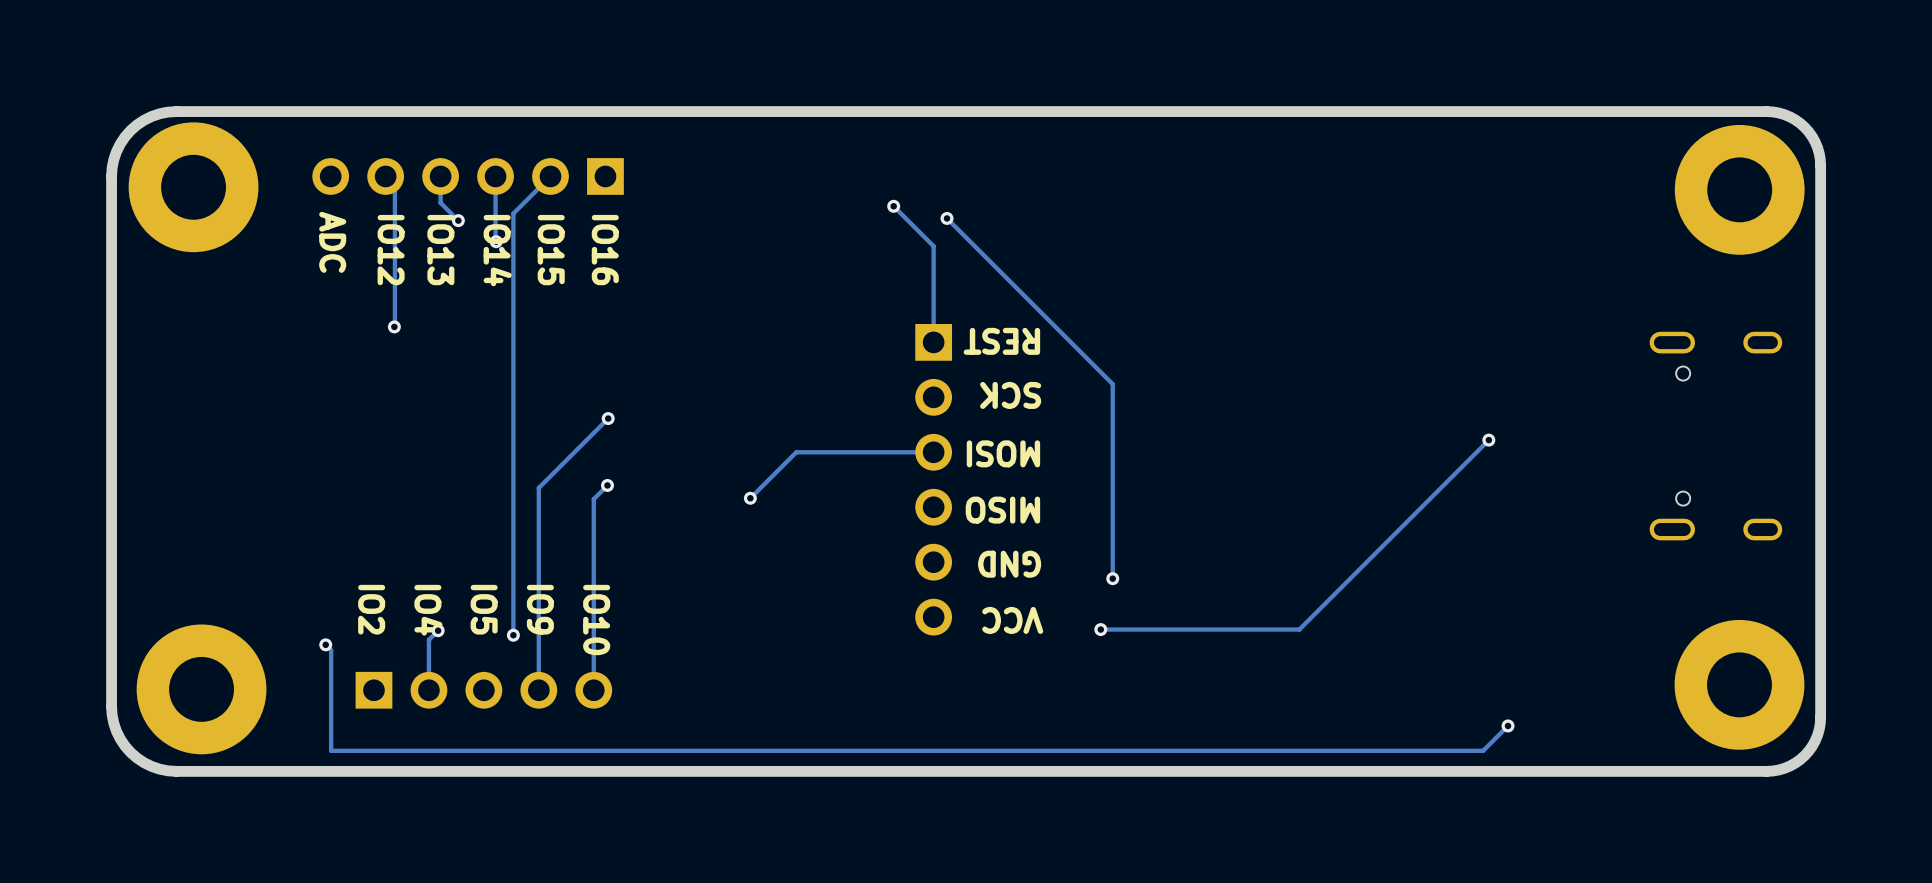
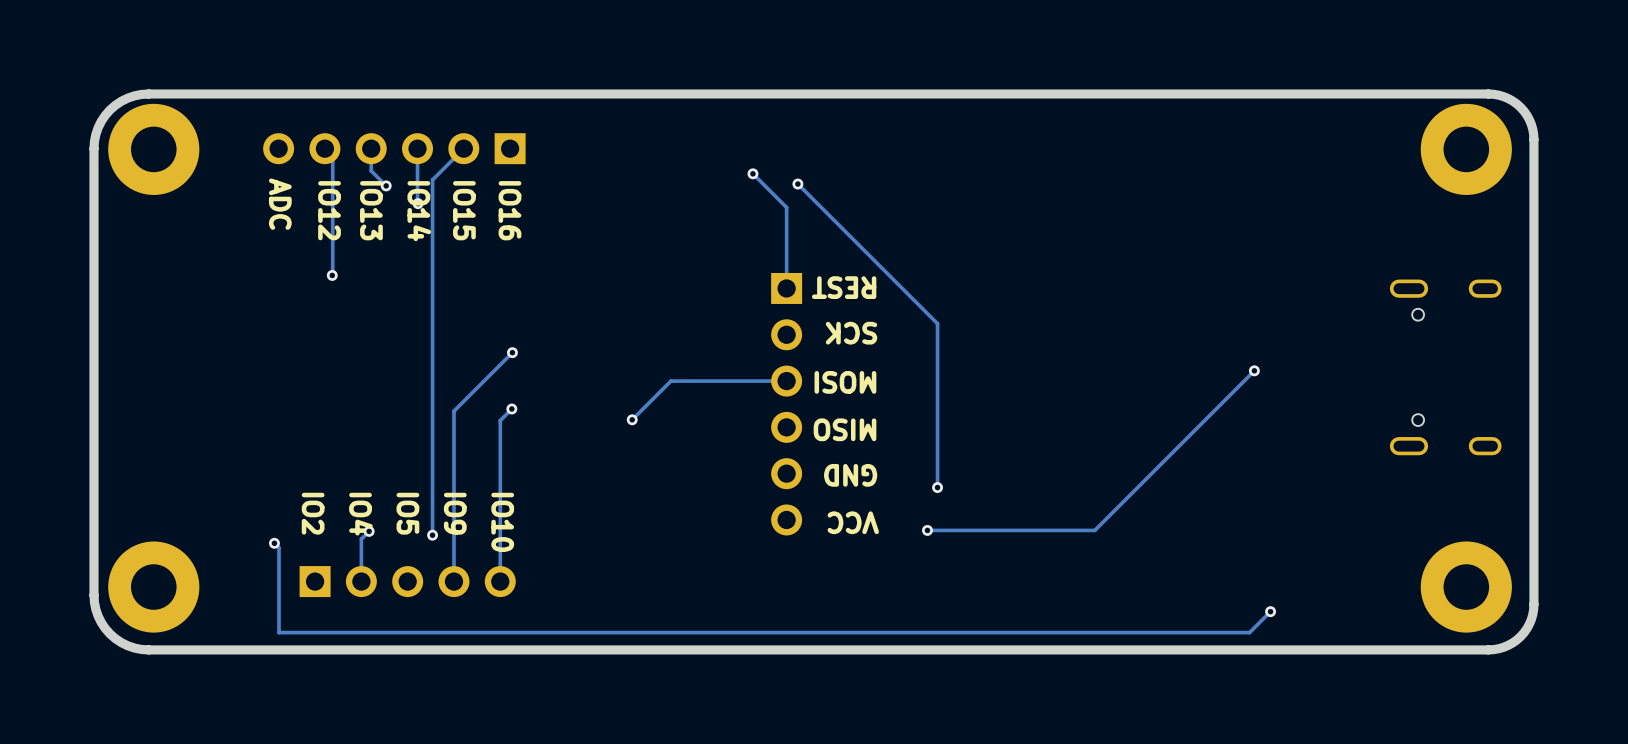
part footprint: [128, 122, 259, 253] -> [108, 103, 200, 195]
part footprint: [1674, 124, 1805, 255] -> [1420, 103, 1512, 195]
part footprint: [1674, 619, 1805, 750] -> [1420, 541, 1512, 633]
part footprint: [136, 624, 267, 755] -> [108, 541, 200, 633]

